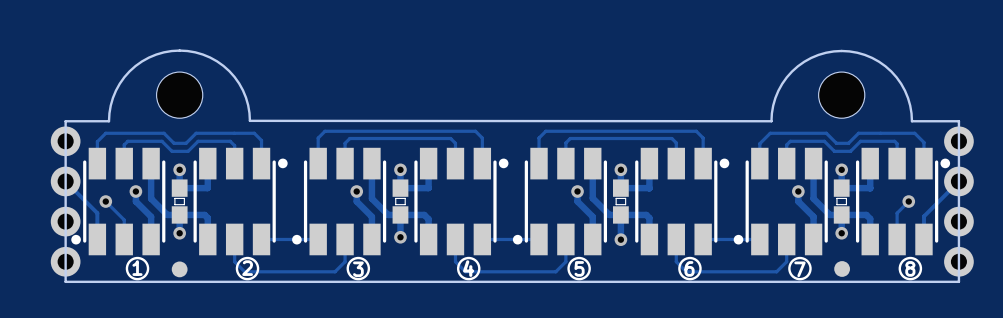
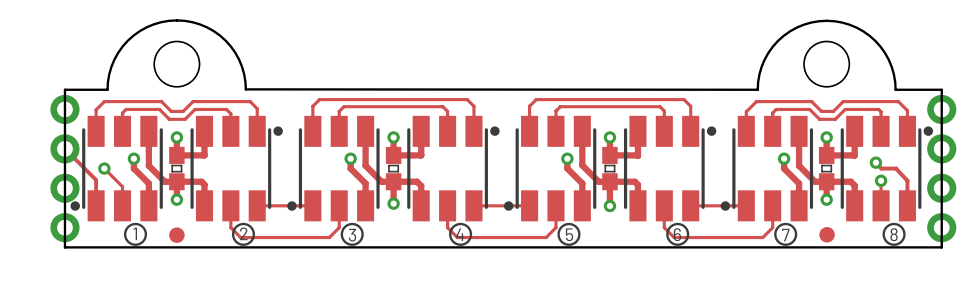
track: (958, 181) (924, 216) (924, 239) -> (875, 162) (881, 168) (896, 168) (907, 180) (907, 205)
via: none -> (875, 162)
track: (908, 201) (897, 213) -> none
via: (908, 201) -> none
via: none -> (881, 180)

